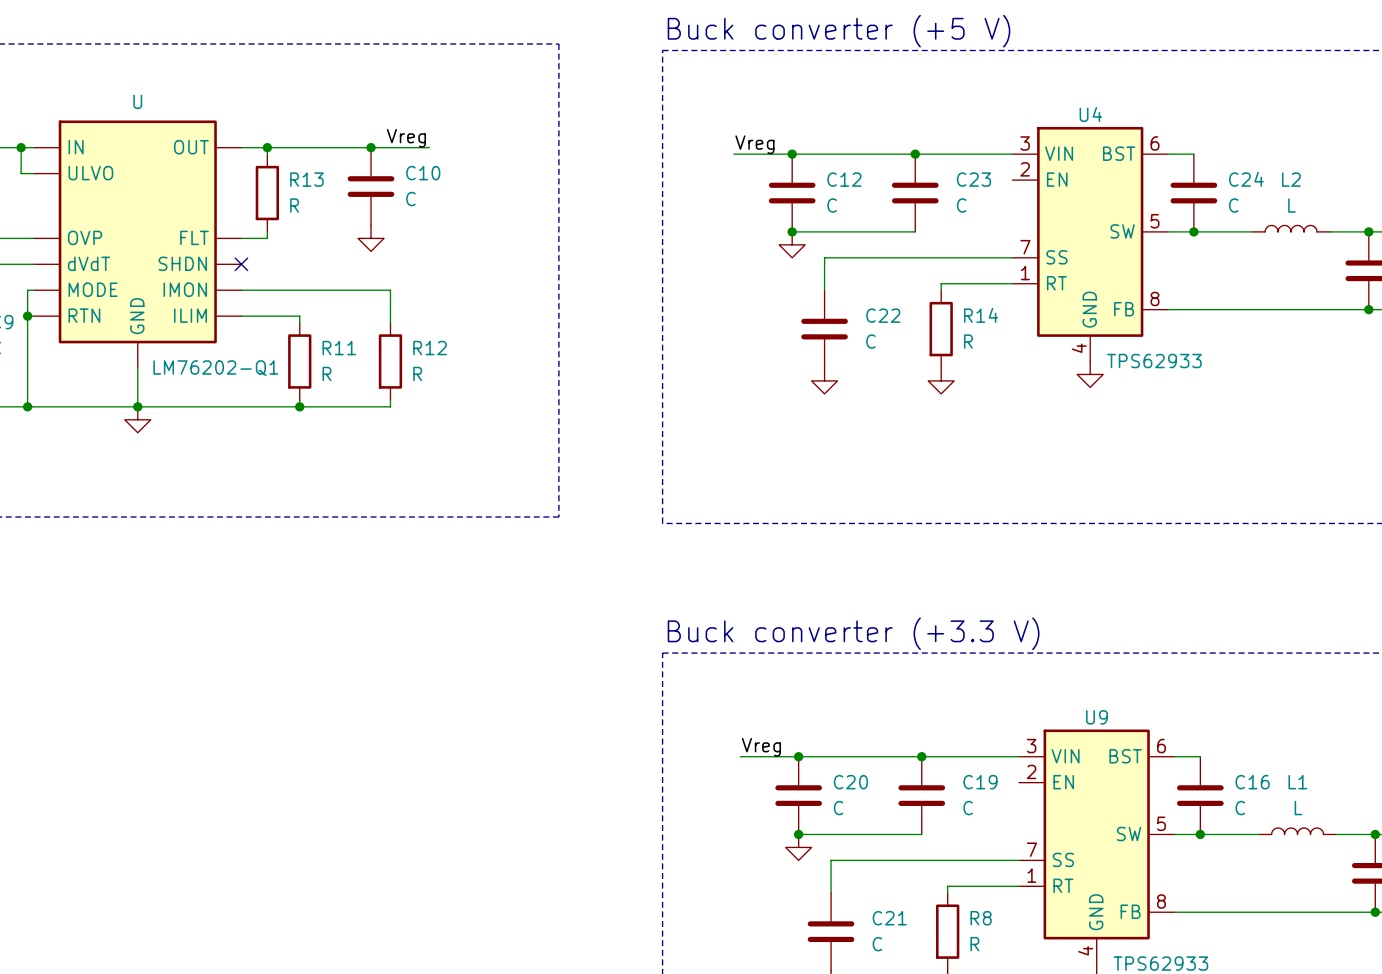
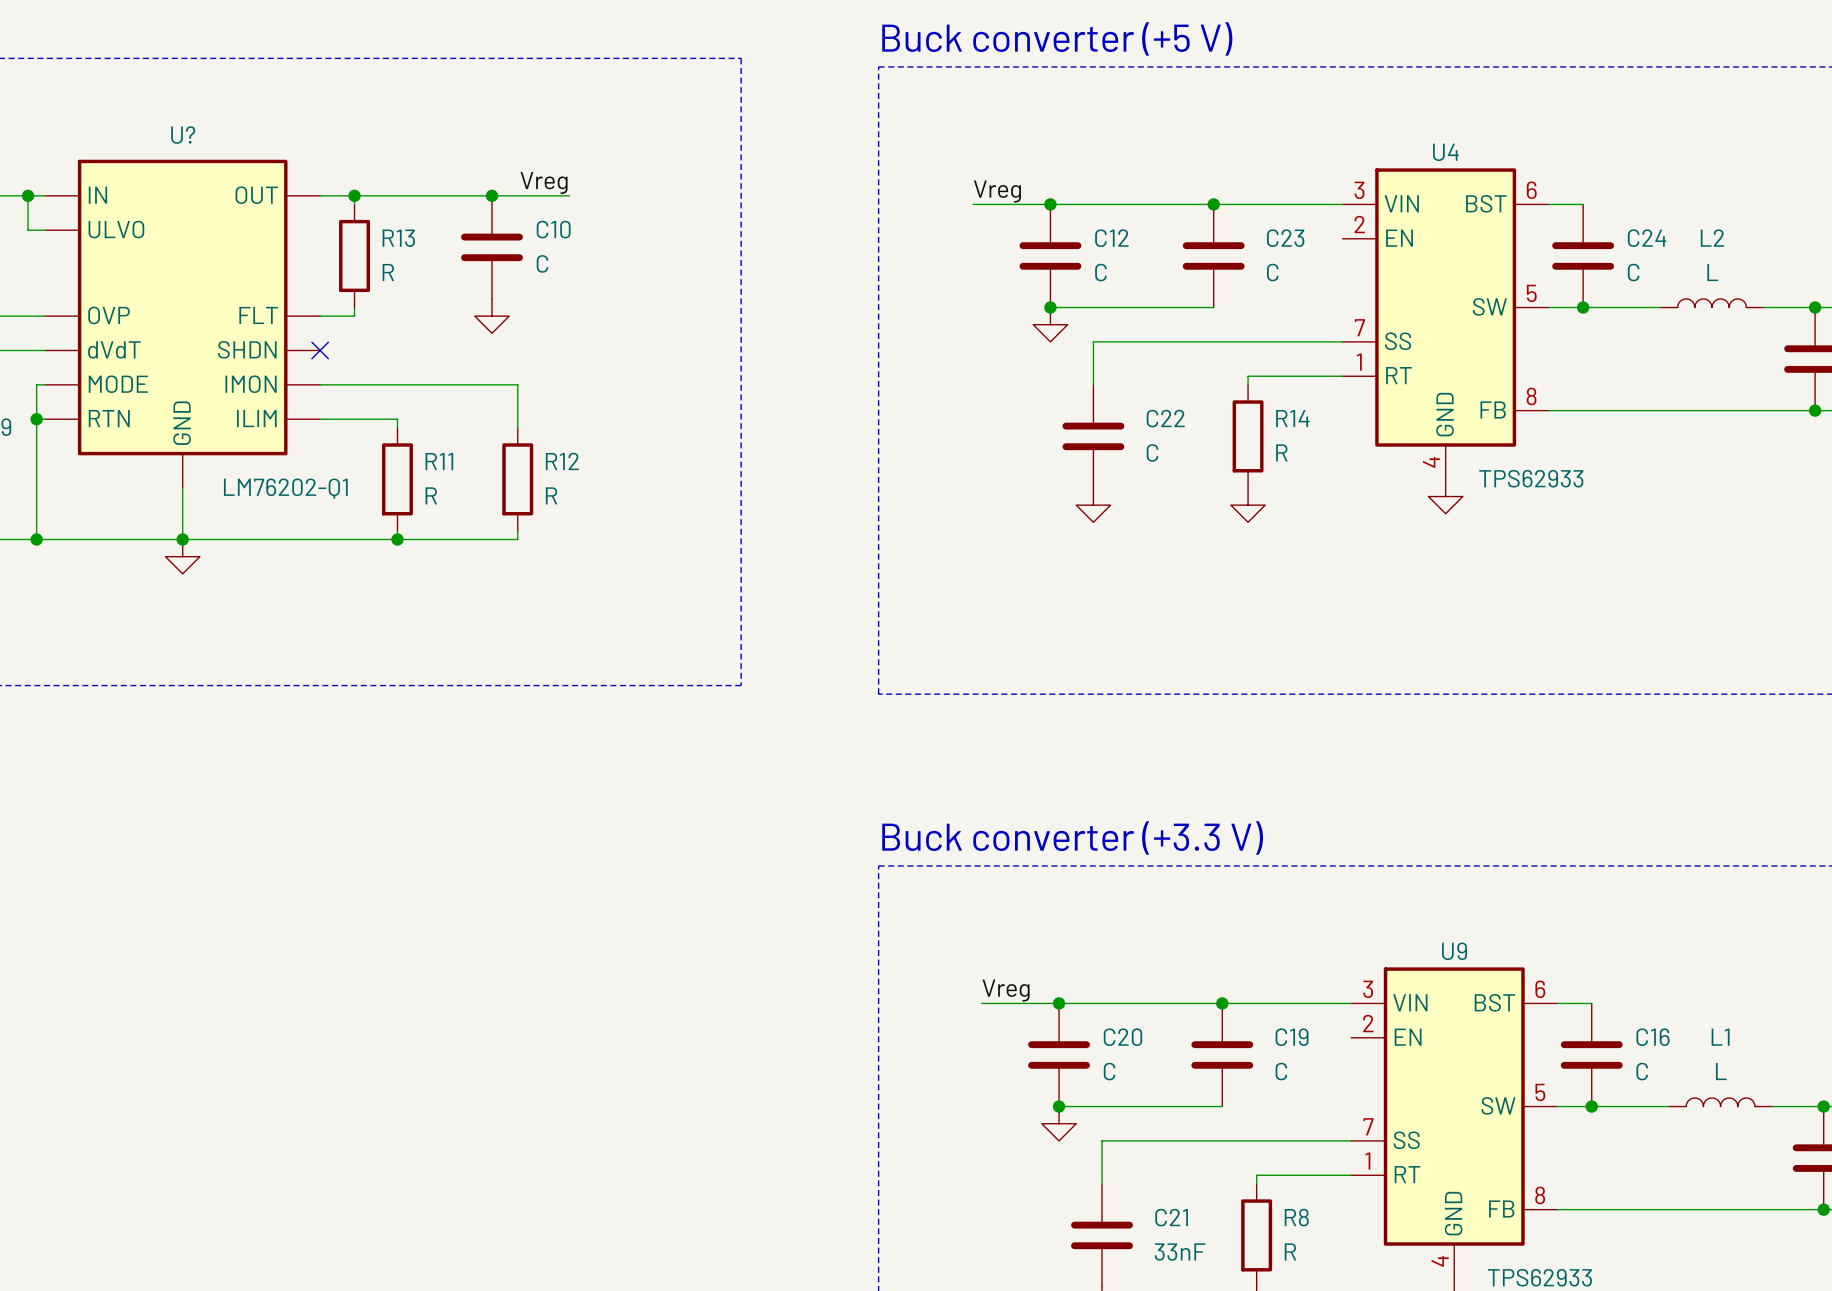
U name: U (137, 101) -> U? (183, 135)
C21 value: C (877, 944) -> 33nF (1180, 1252)

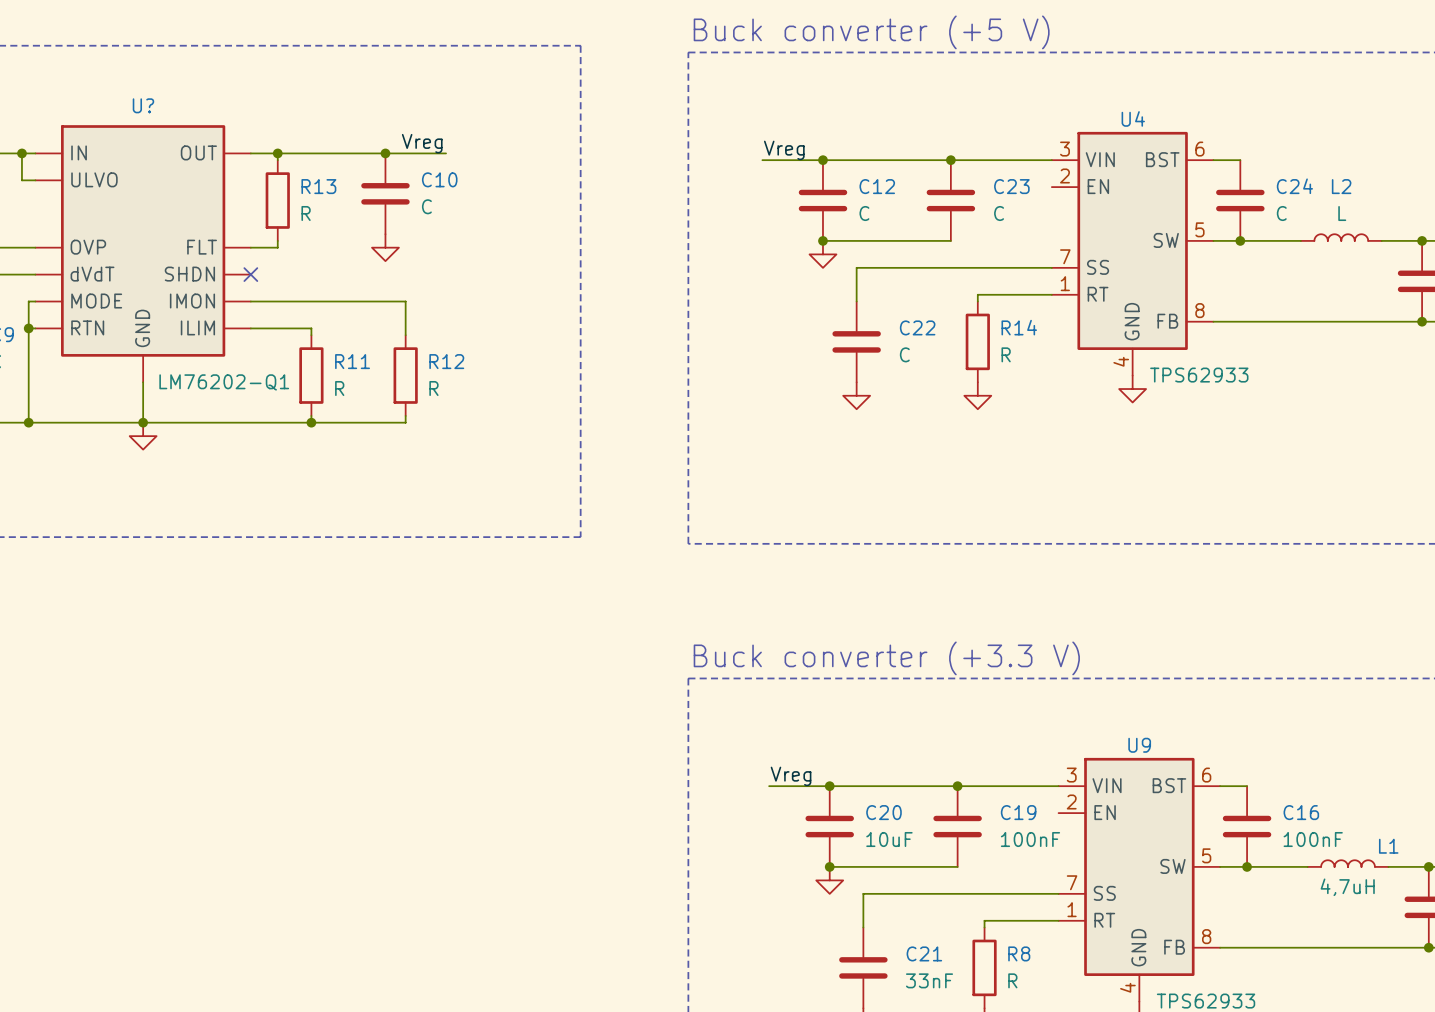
L1 name position: L1 (1720, 1037) -> L1 (1388, 846)
C20 value: C (1109, 1071) -> 10uF (889, 839)
C19 value: C (1281, 1071) -> 100nF (1030, 839)
C16 value: C (1642, 1071) -> 100nF (1313, 839)
L1 value: L (1721, 1071) -> 4,7uH (1347, 887)

